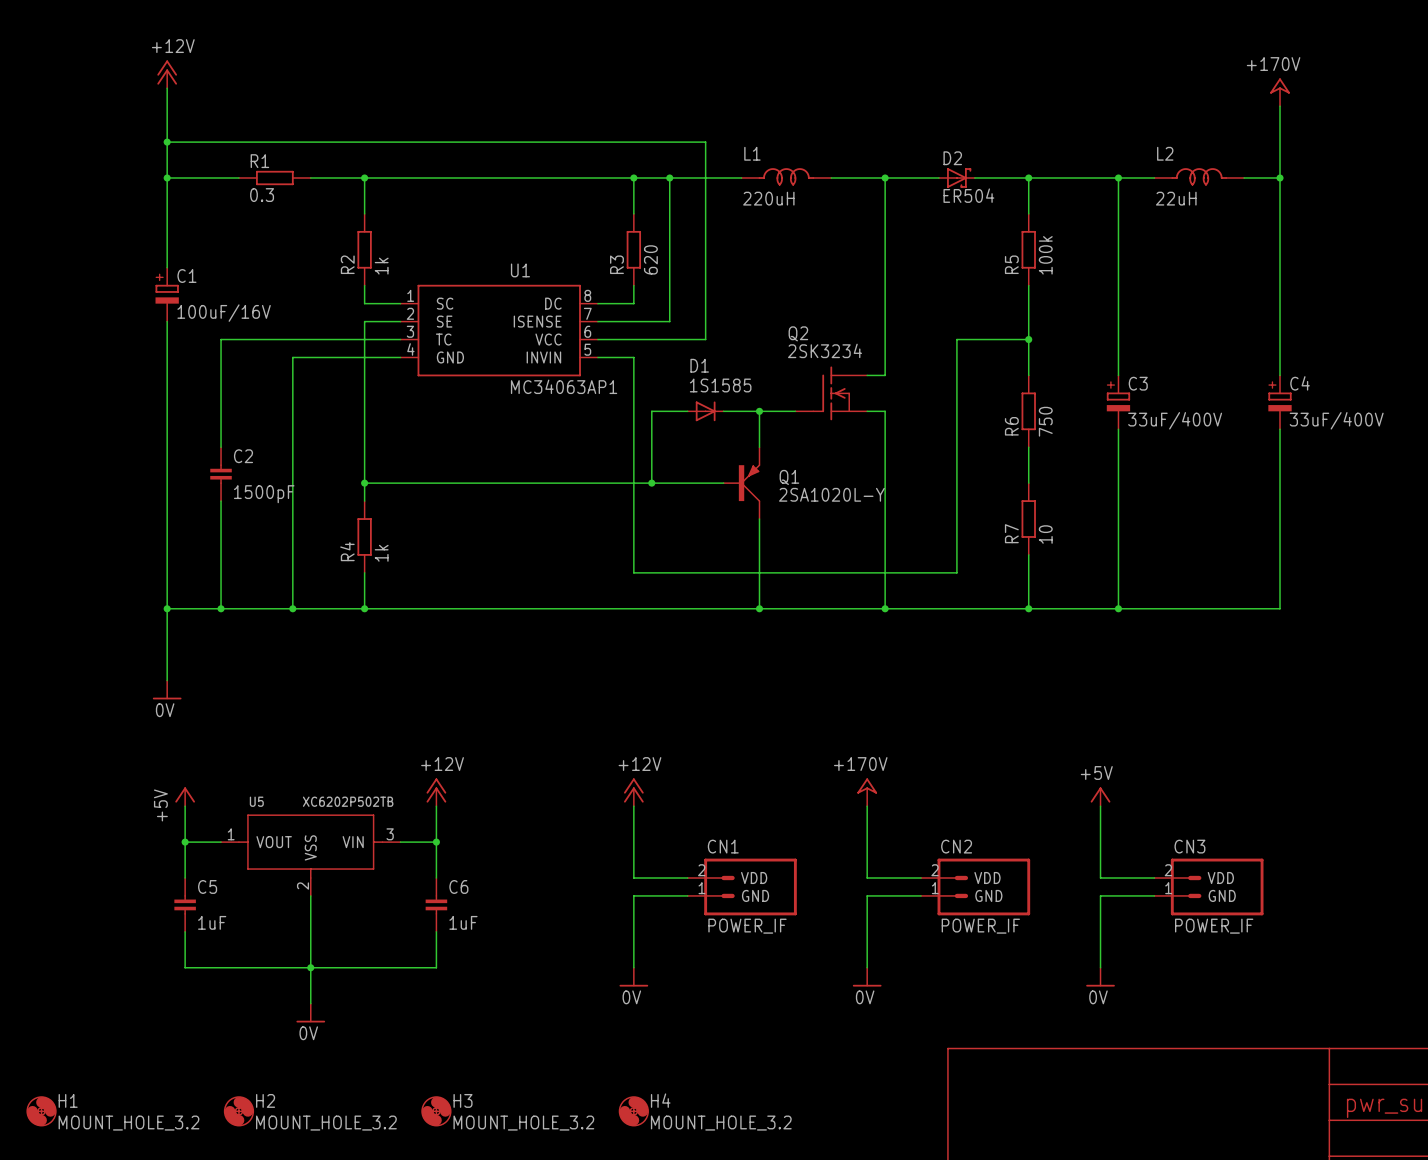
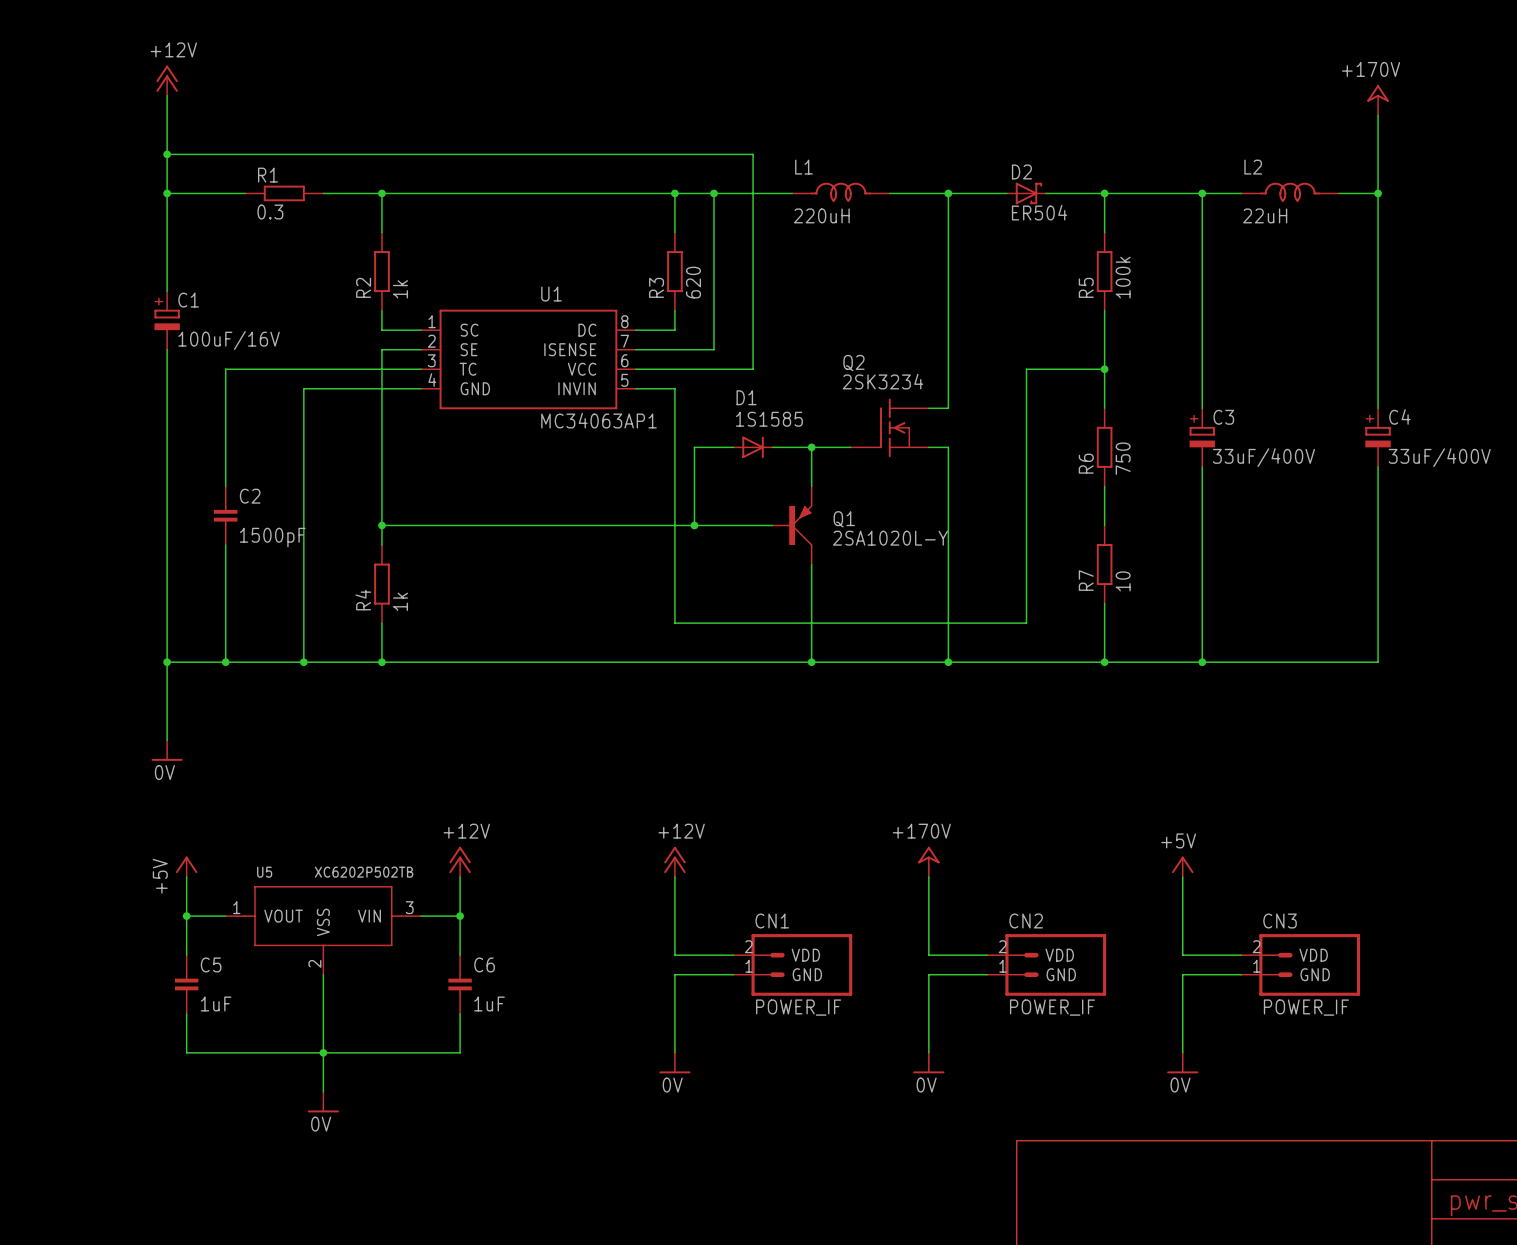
H1: MOUNT_HOLE_3.2 (41, 1111) -> none
H2: MOUNT_HOLE_3.2 (238, 1111) -> none
H3: MOUNT_HOLE_3.2 (436, 1111) -> none
H4: MOUNT_HOLE_3.2 (633, 1111) -> none

